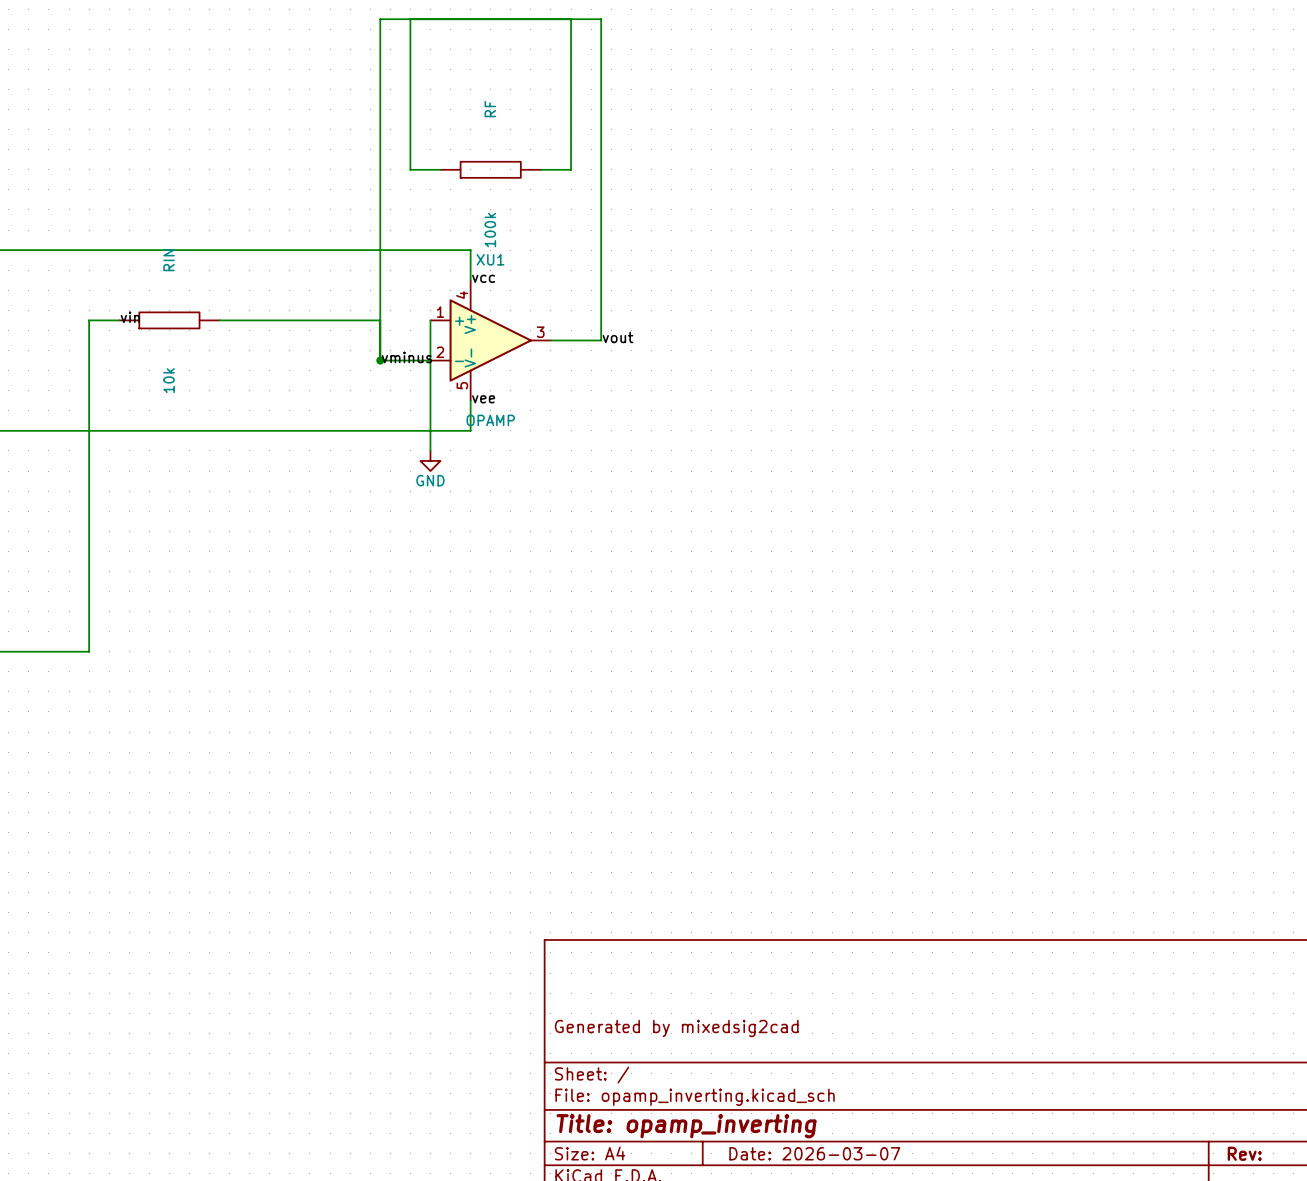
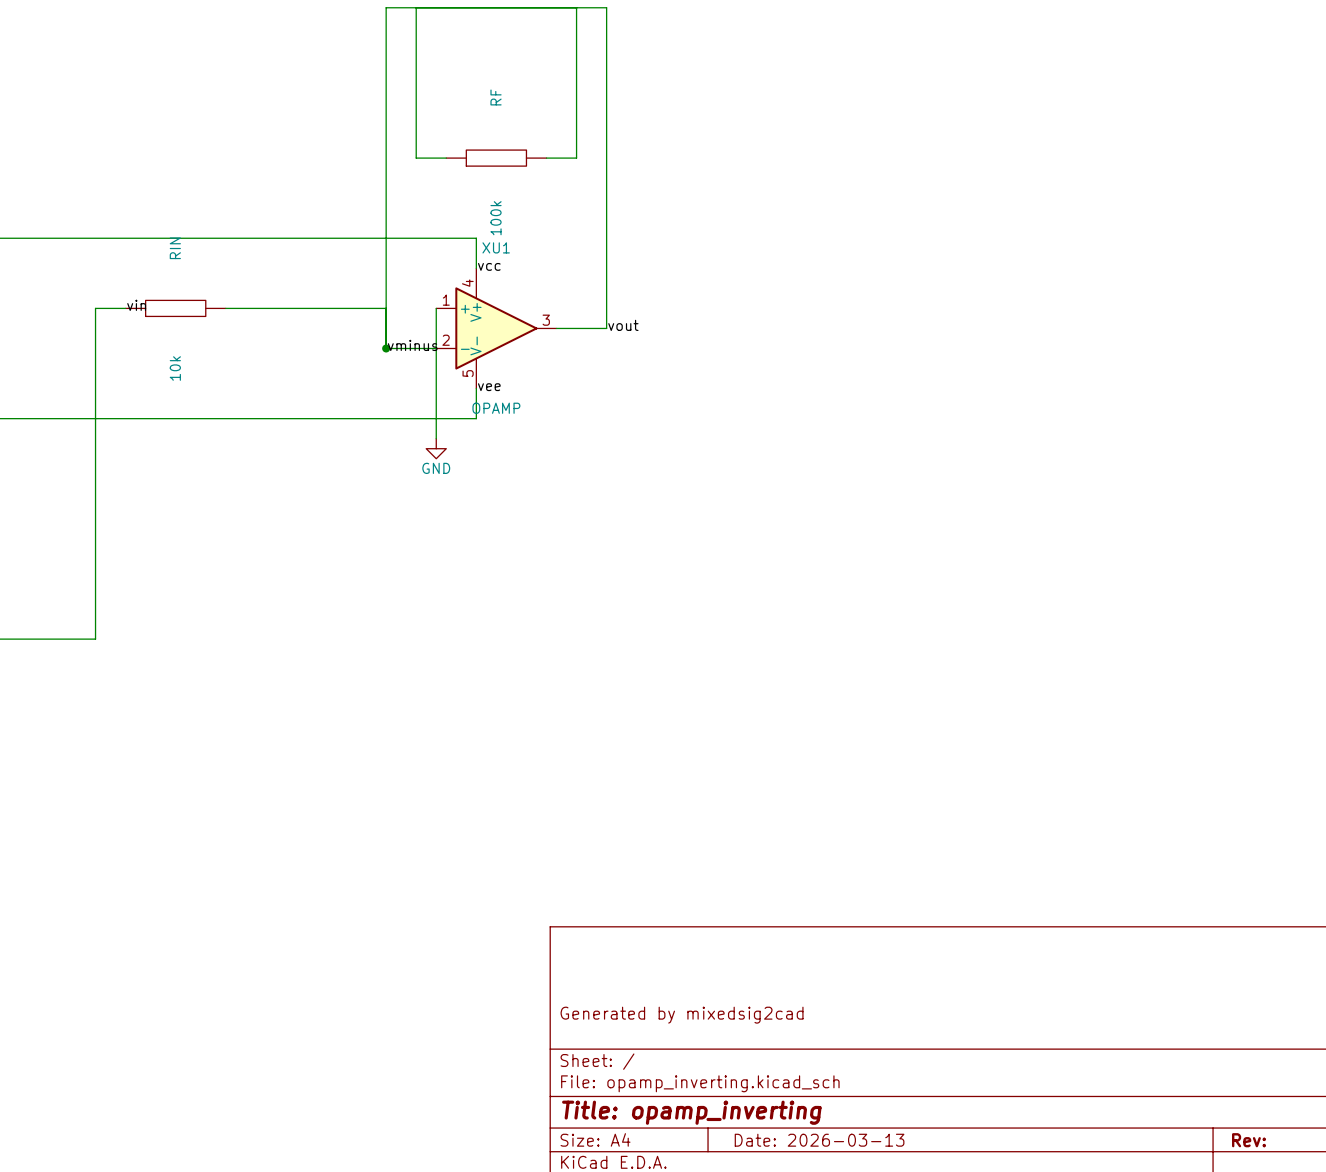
title block: Date: 2026-03-07 (814, 1153) -> Date: 2026-03-13 (819, 1140)

